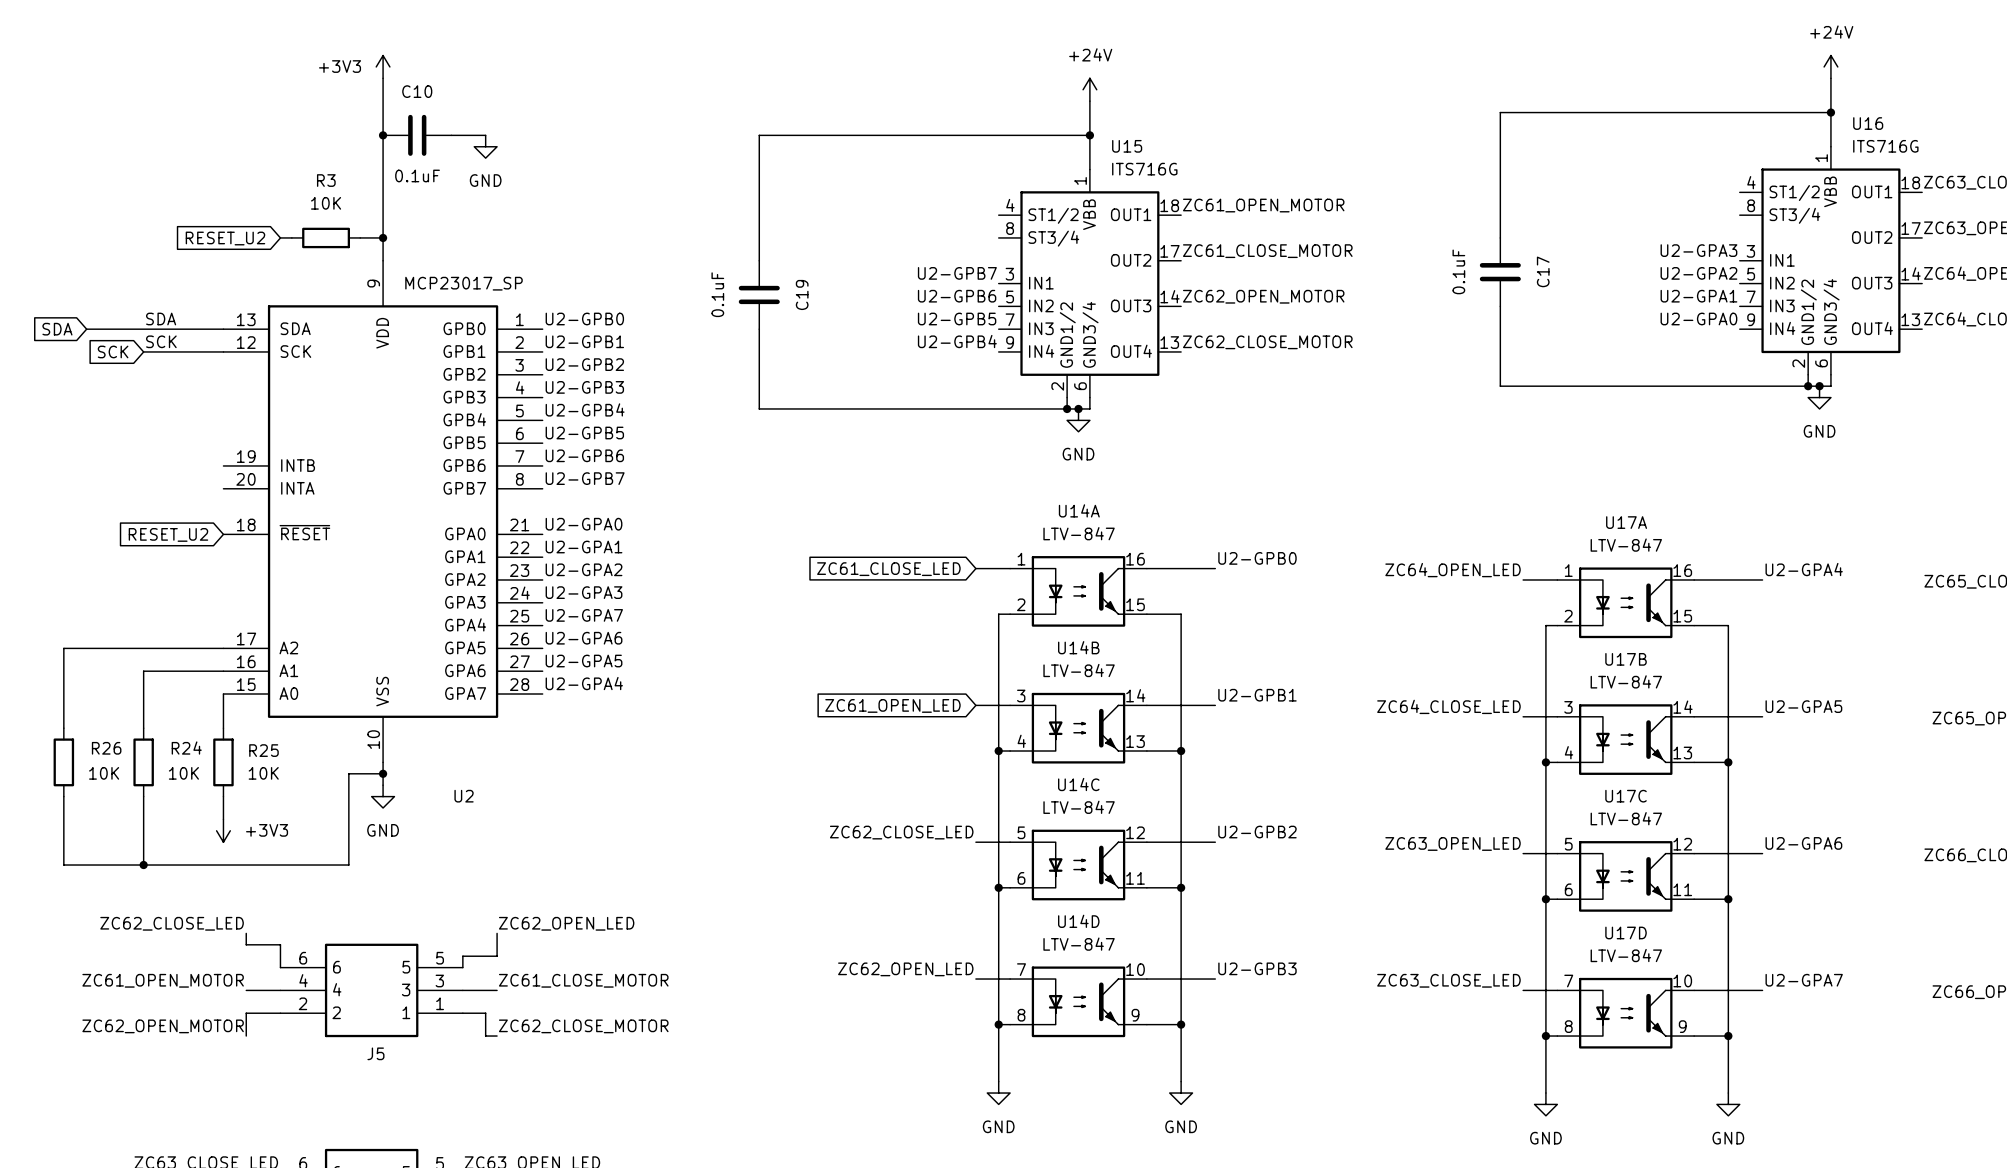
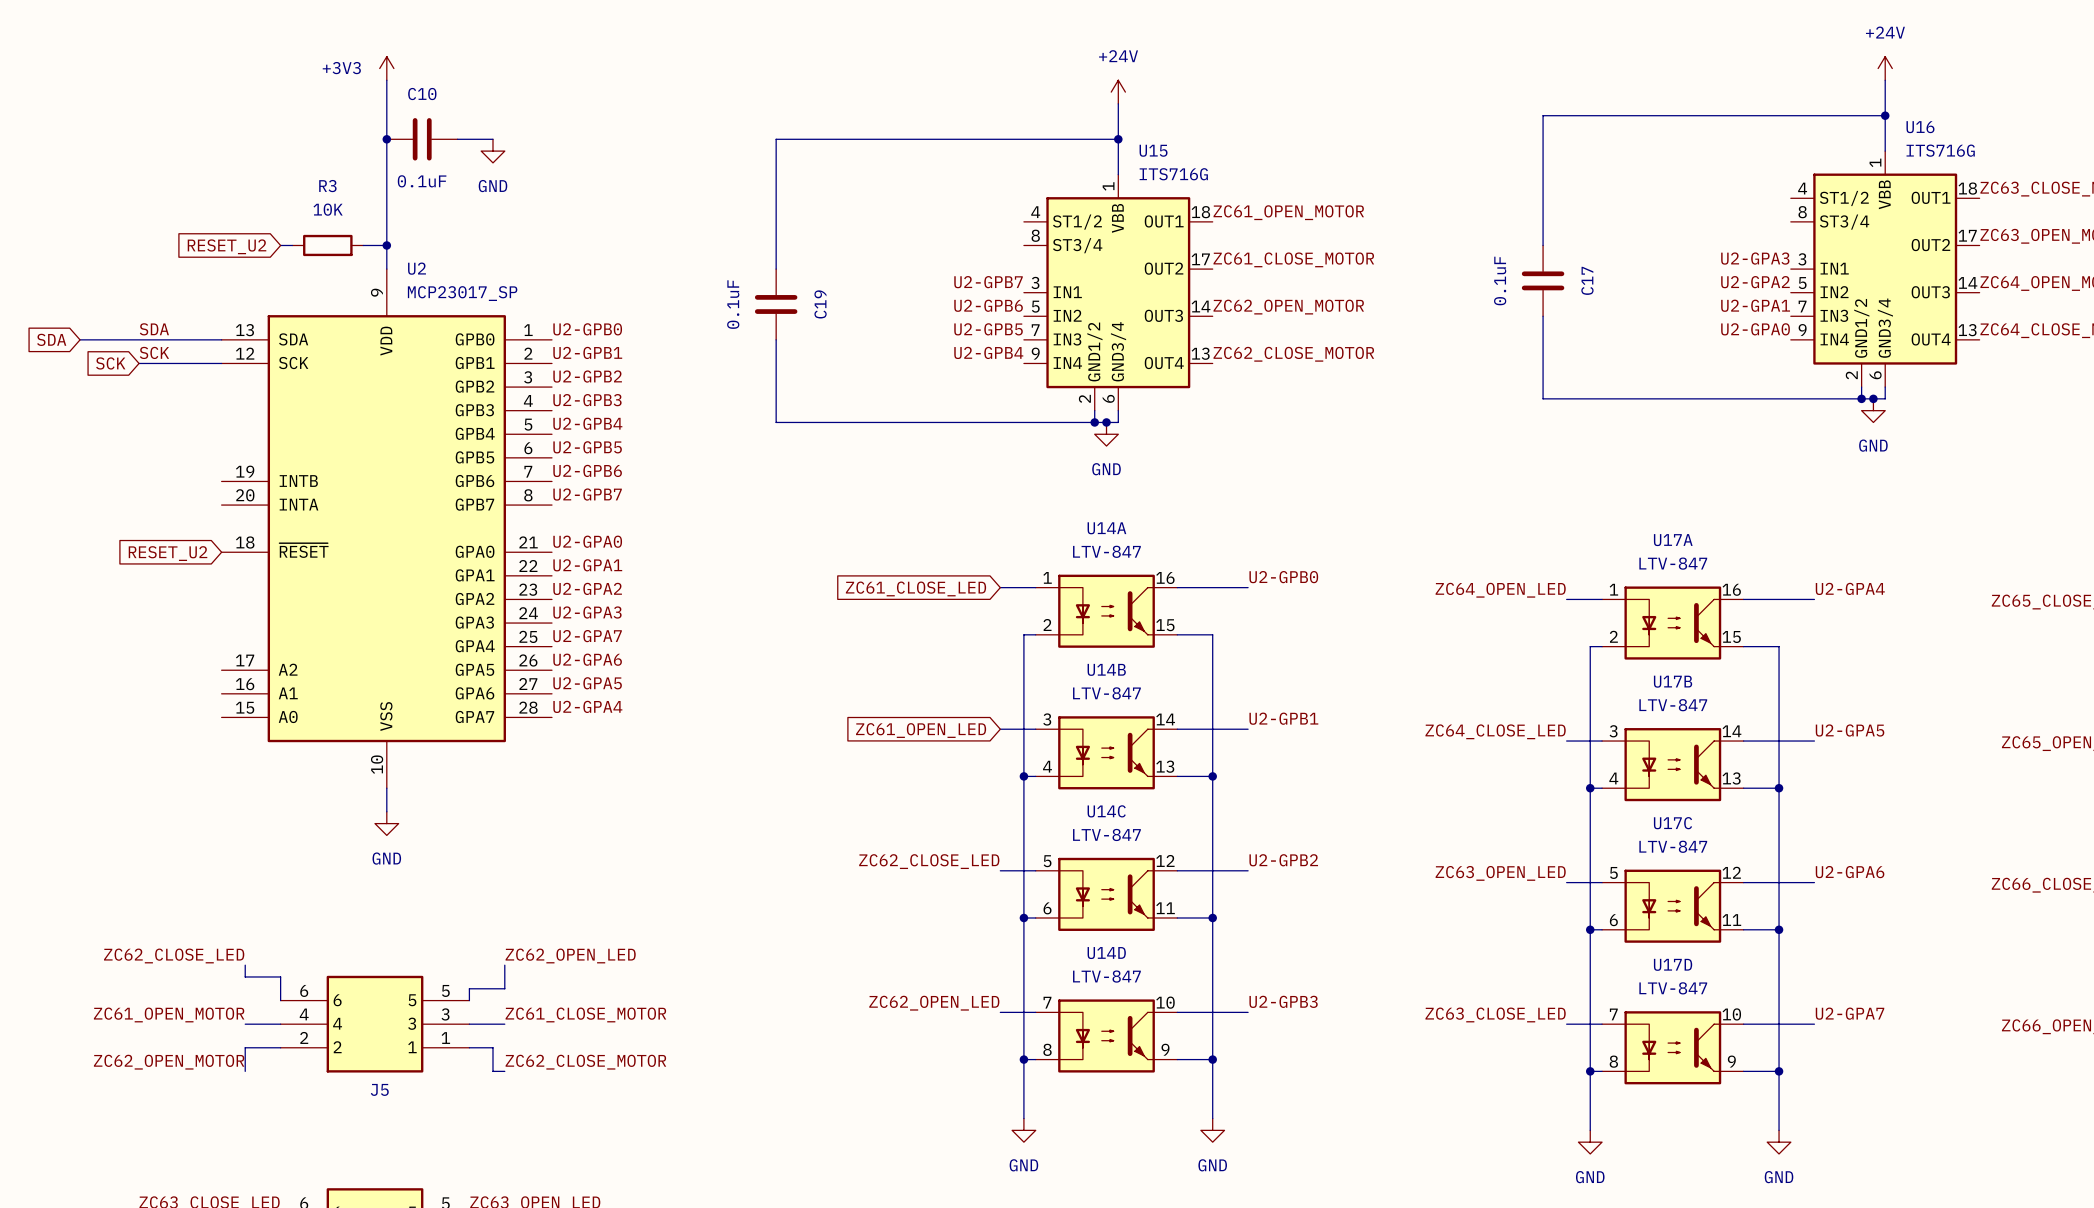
wire: (223, 648) (63, 648) (63, 728) -> none
wire: (223, 671) (143, 671) (143, 728) -> none
wire: (223, 694) (223, 728) -> none
R26: 10K (63, 762) -> none
R24: 10K (143, 762) -> none
R25: 10K (223, 762) -> none
wire: (383, 773) (348, 773) (348, 865) (63, 865) (63, 796) -> none
junction: (383, 773) -> none
wire: (143, 796) (143, 865) -> none
wire: (223, 796) (223, 819) -> none
U2 name position: U2 (464, 796) -> U2 (417, 268)
power symbol: +3V3 (223, 830) -> none
junction: (143, 865) -> none

